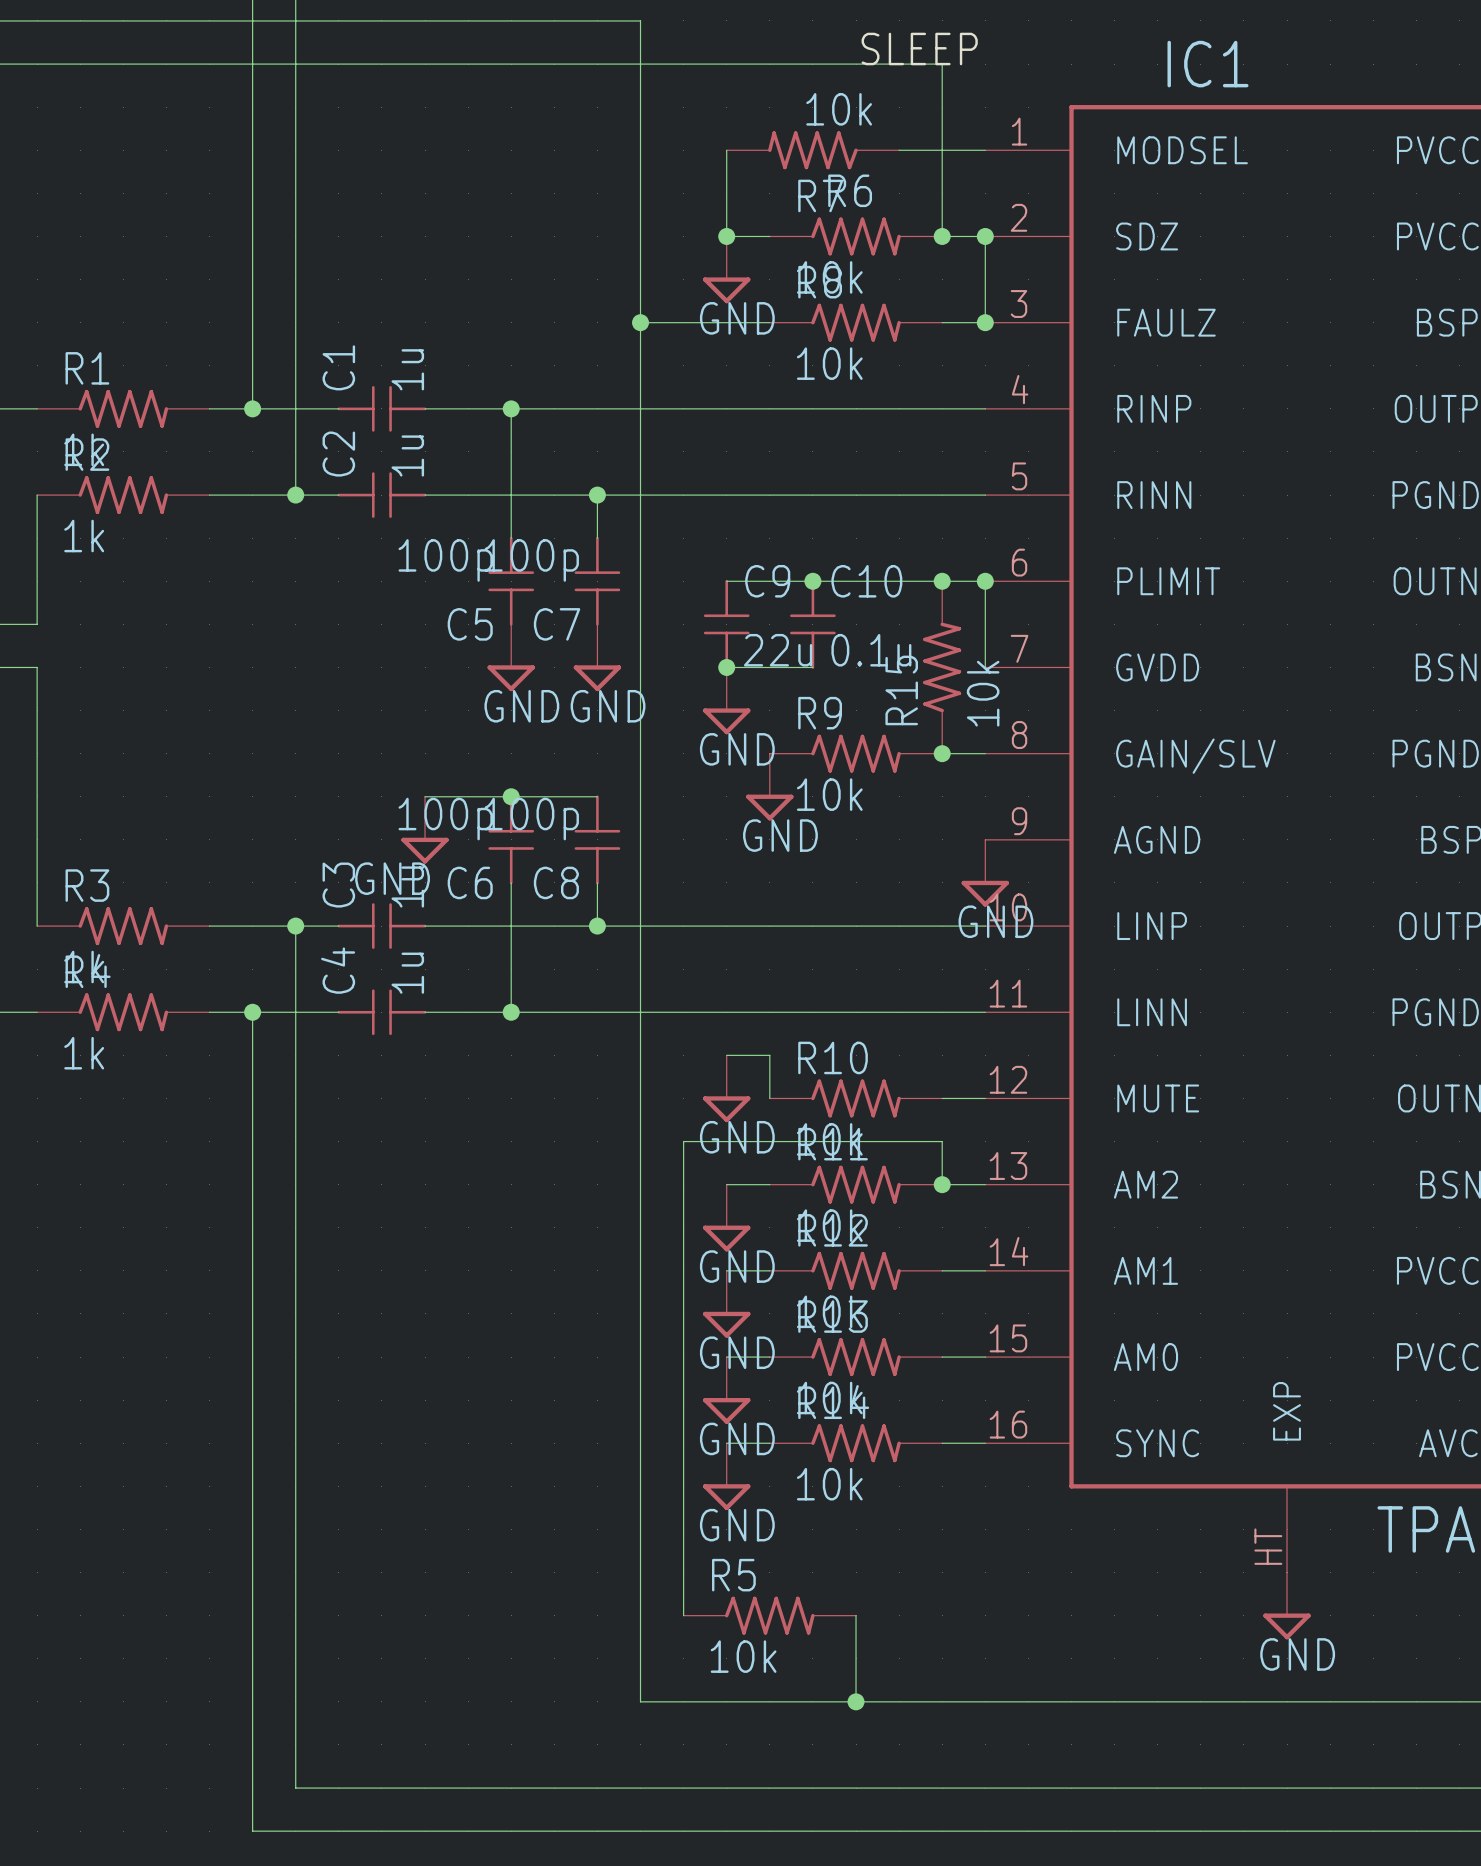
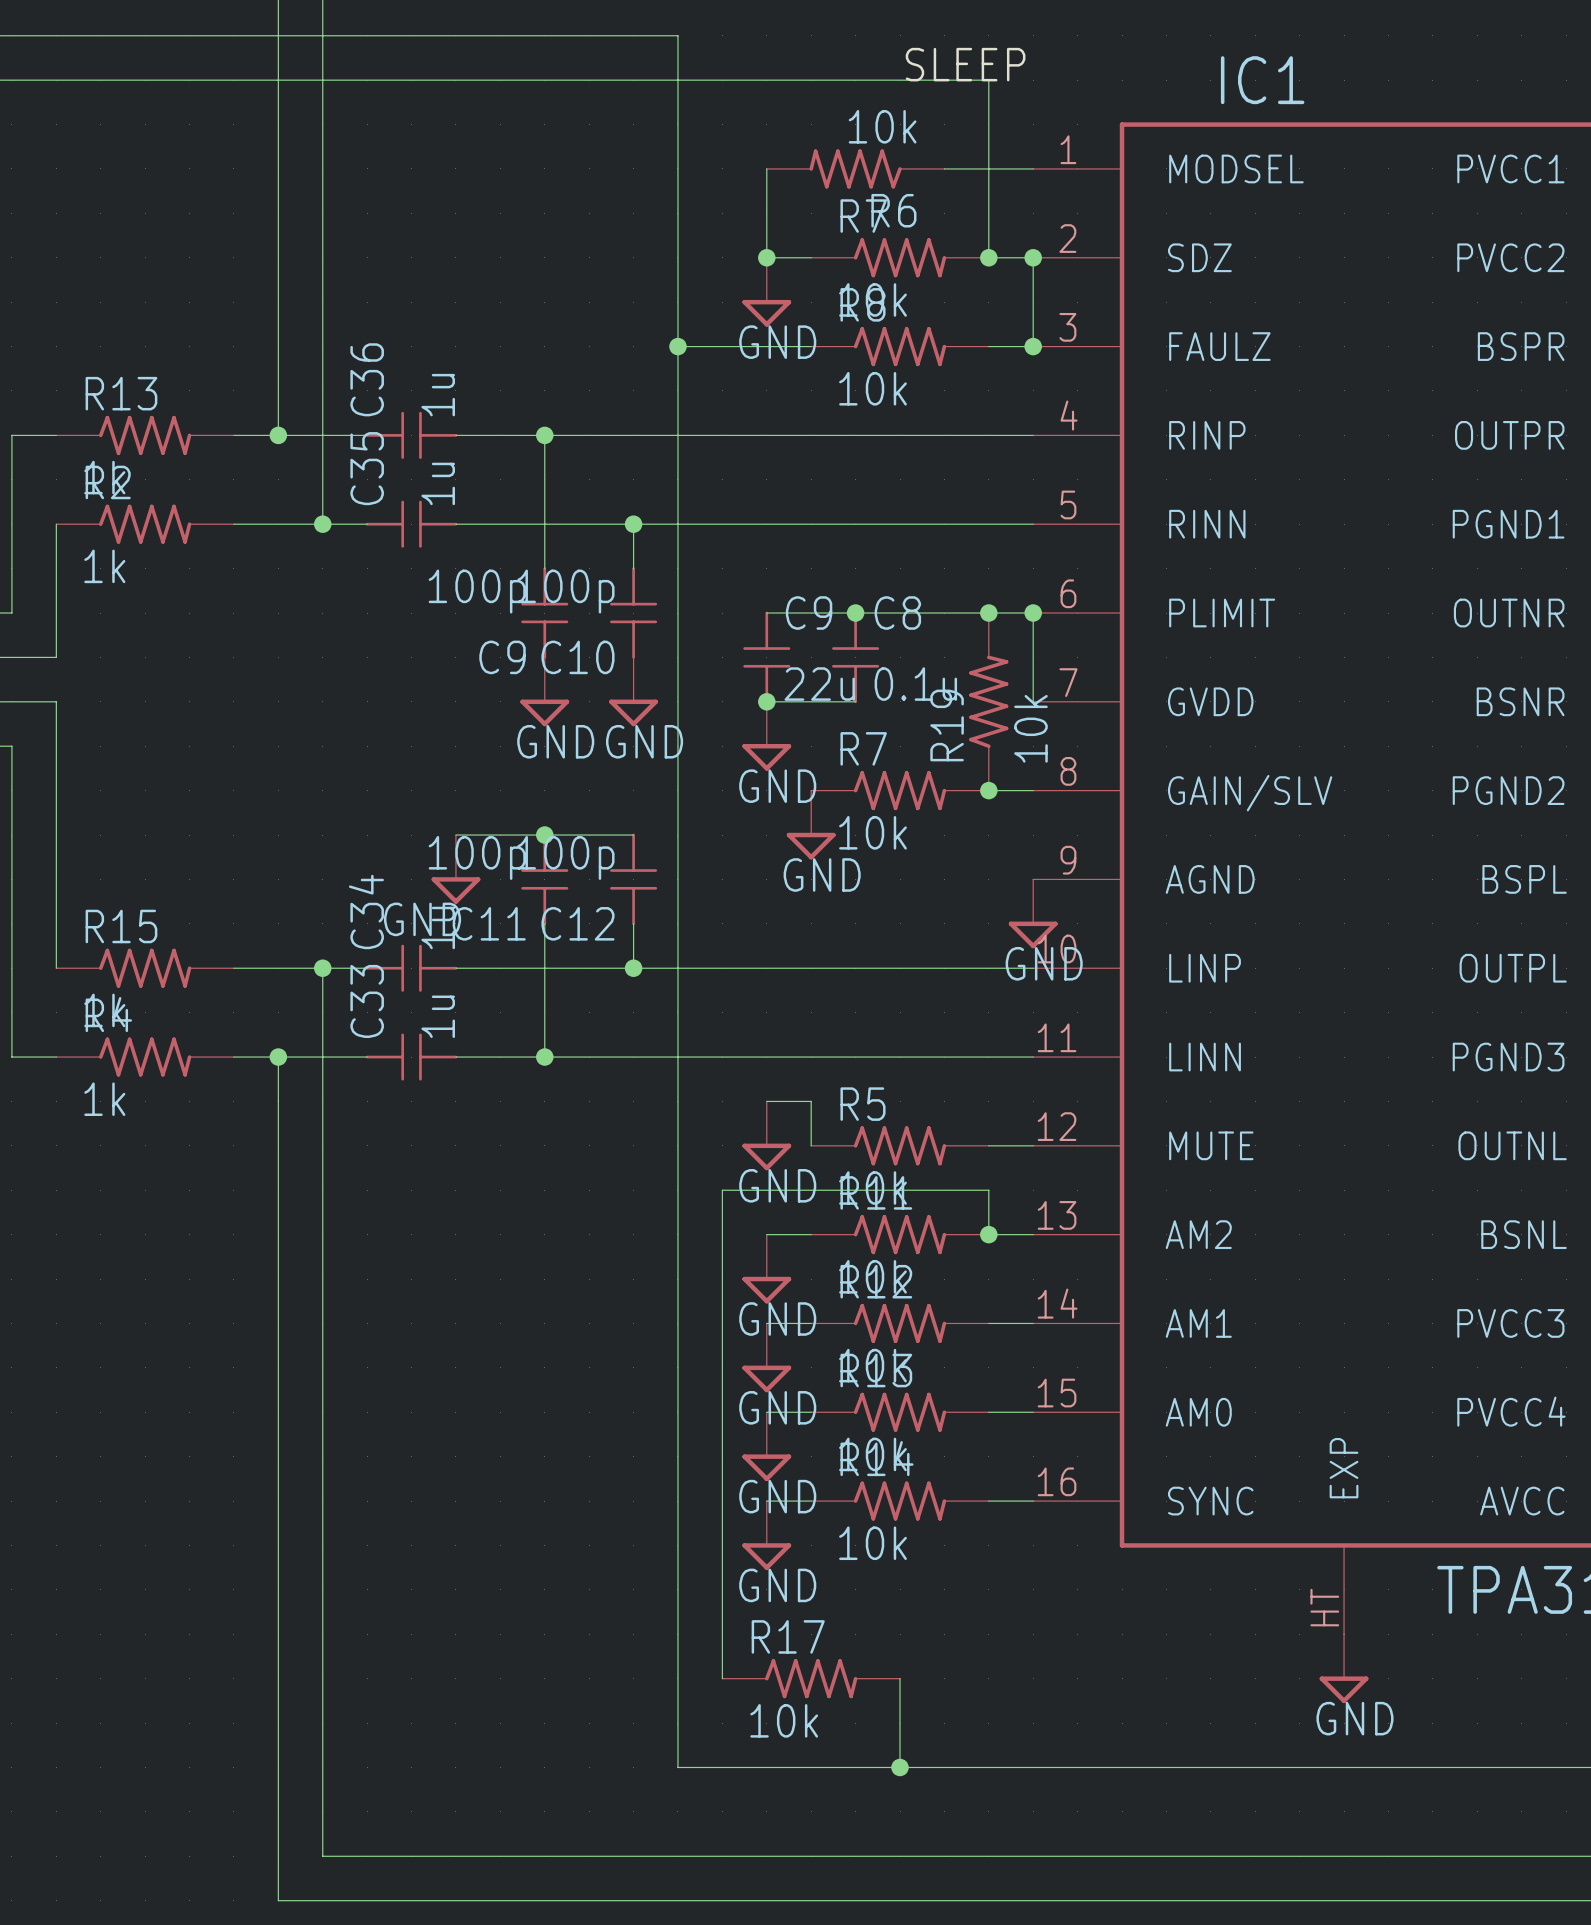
C1 name: C1 (338, 367) -> C36 (367, 379)
R1 name: R1 (87, 368) -> R13 (121, 393)
C2 name: C2 (338, 454) -> C35 (367, 468)
C10 name: C10 (866, 581) -> C8 (897, 613)
C5 name: C5 (470, 624) -> C9 (502, 657)
C7 name: C7 (557, 624) -> C10 (577, 657)
R15 name: R15 (901, 690) -> R19 (947, 725)
R9 name: R9 (820, 713) -> R7 (863, 748)
C6 name: C6 (470, 882) -> C11 (489, 923)
C8 name: C8 (556, 882) -> C12 (577, 923)
R3 name: R3 (87, 885) -> R15 (121, 926)
C3 name: C3 (338, 885) -> C34 (366, 911)
C4 name: C4 (338, 970) -> C33 (367, 1001)
R10 name: R10 (833, 1057) -> R5 (863, 1104)
R5 name: R5 (733, 1575) -> R17 (788, 1636)

